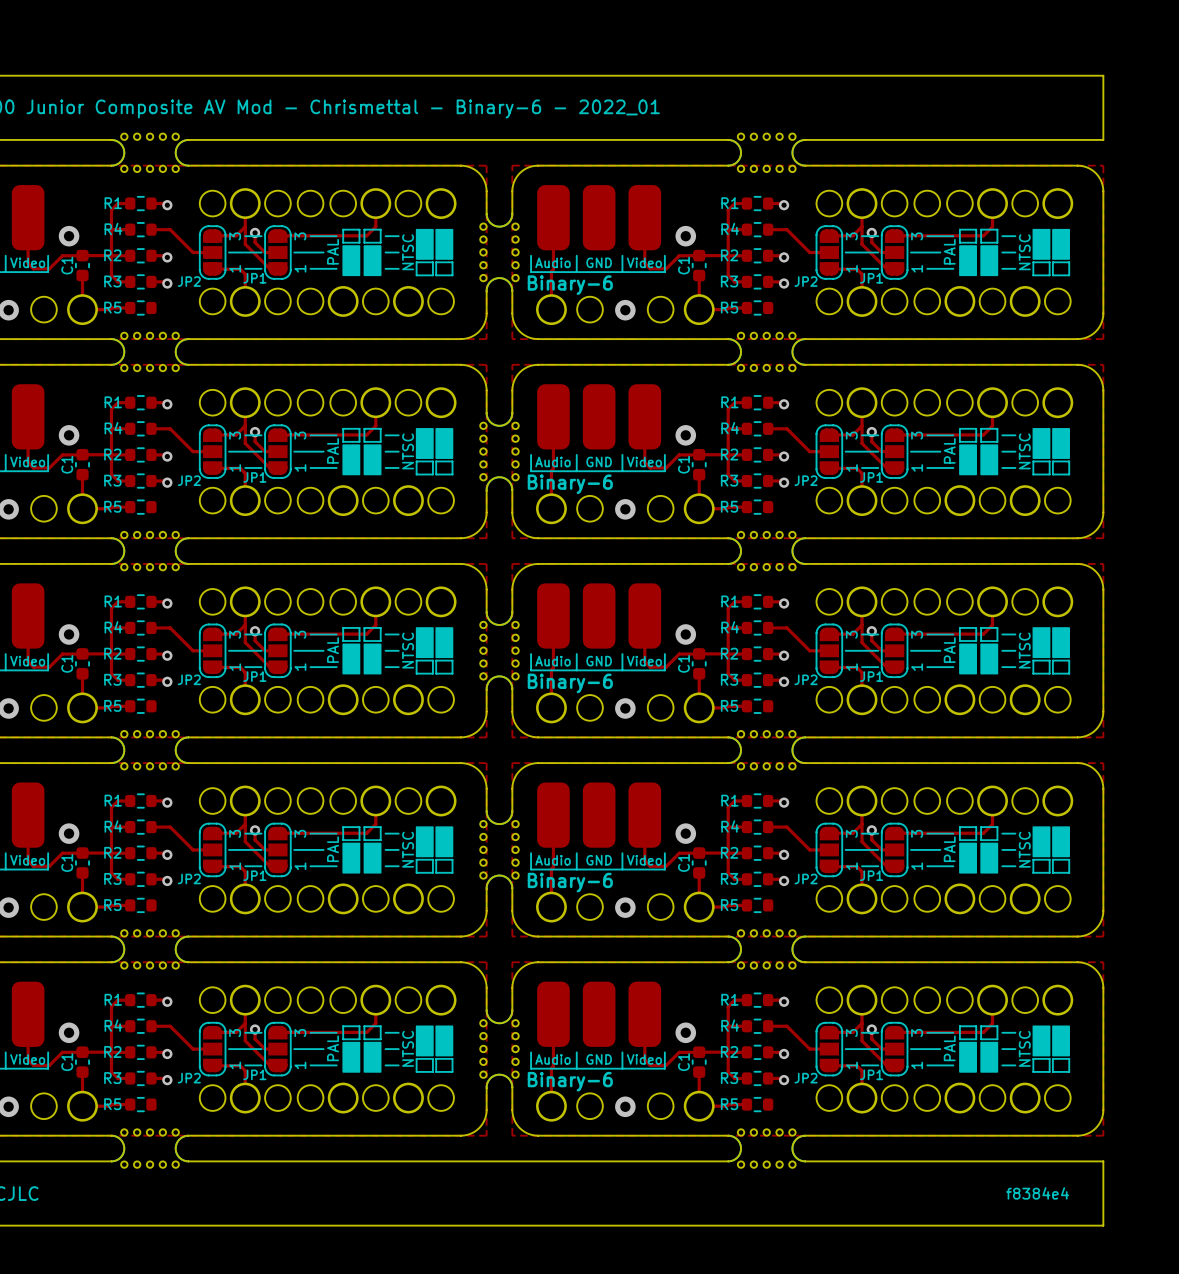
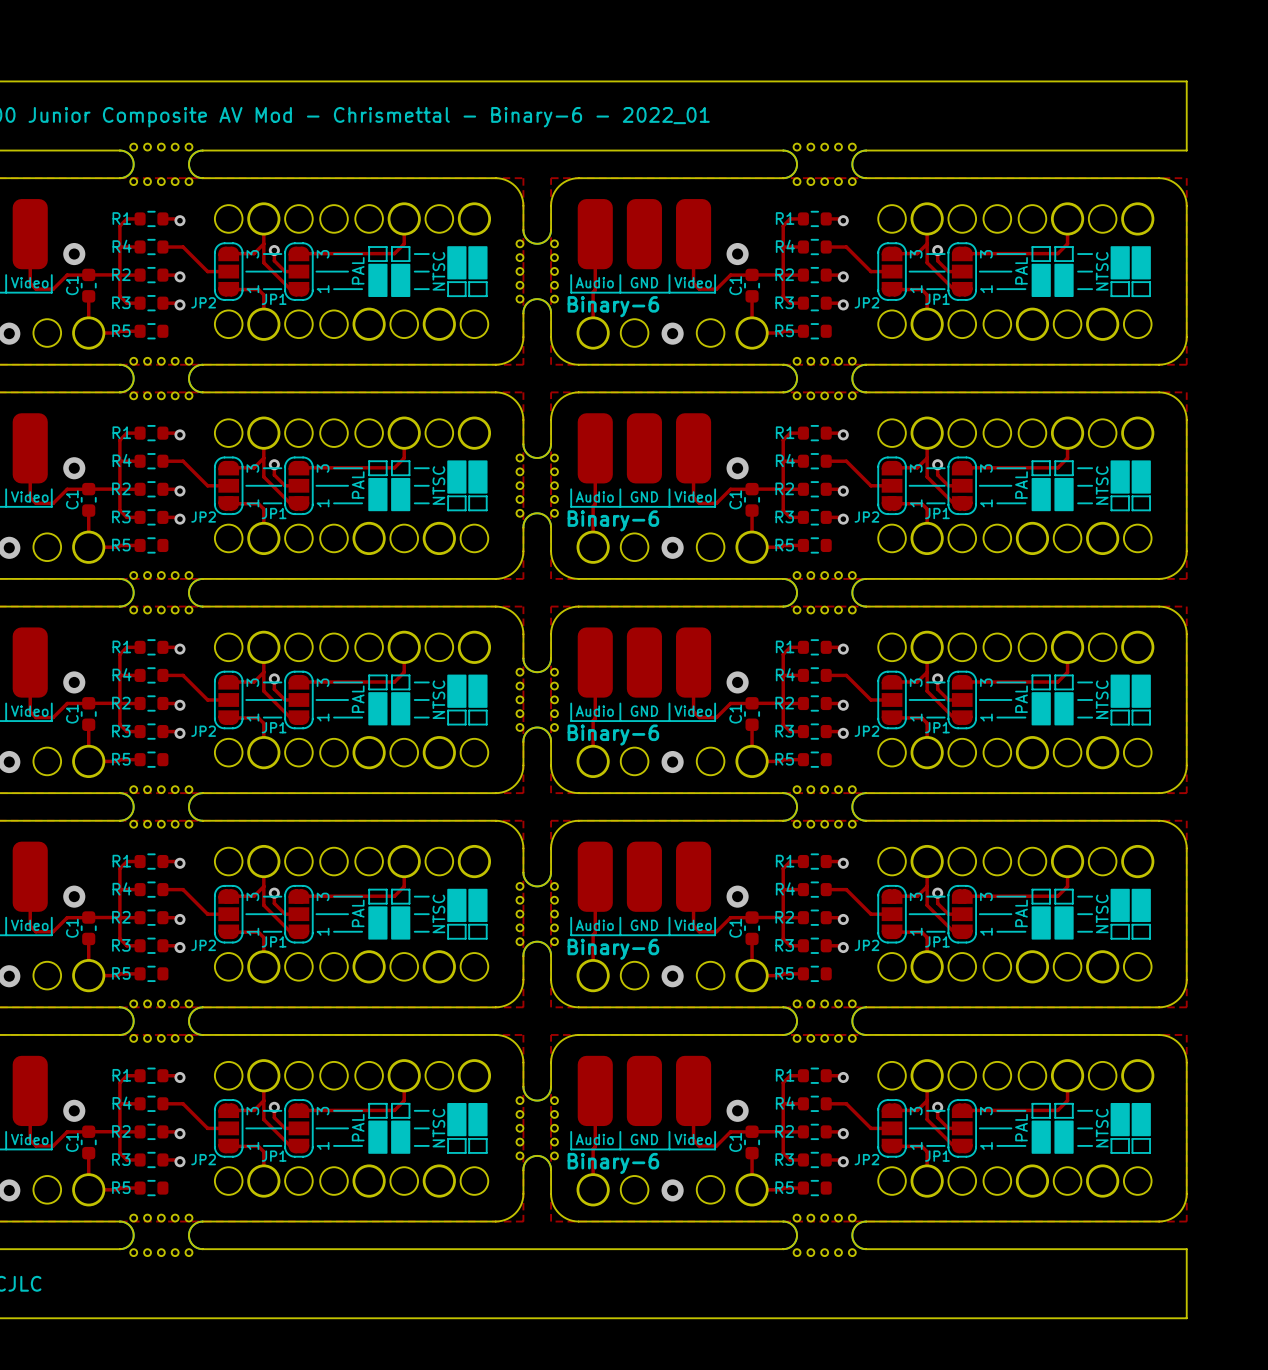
text: f8384e4 (1037, 1193) -> none

